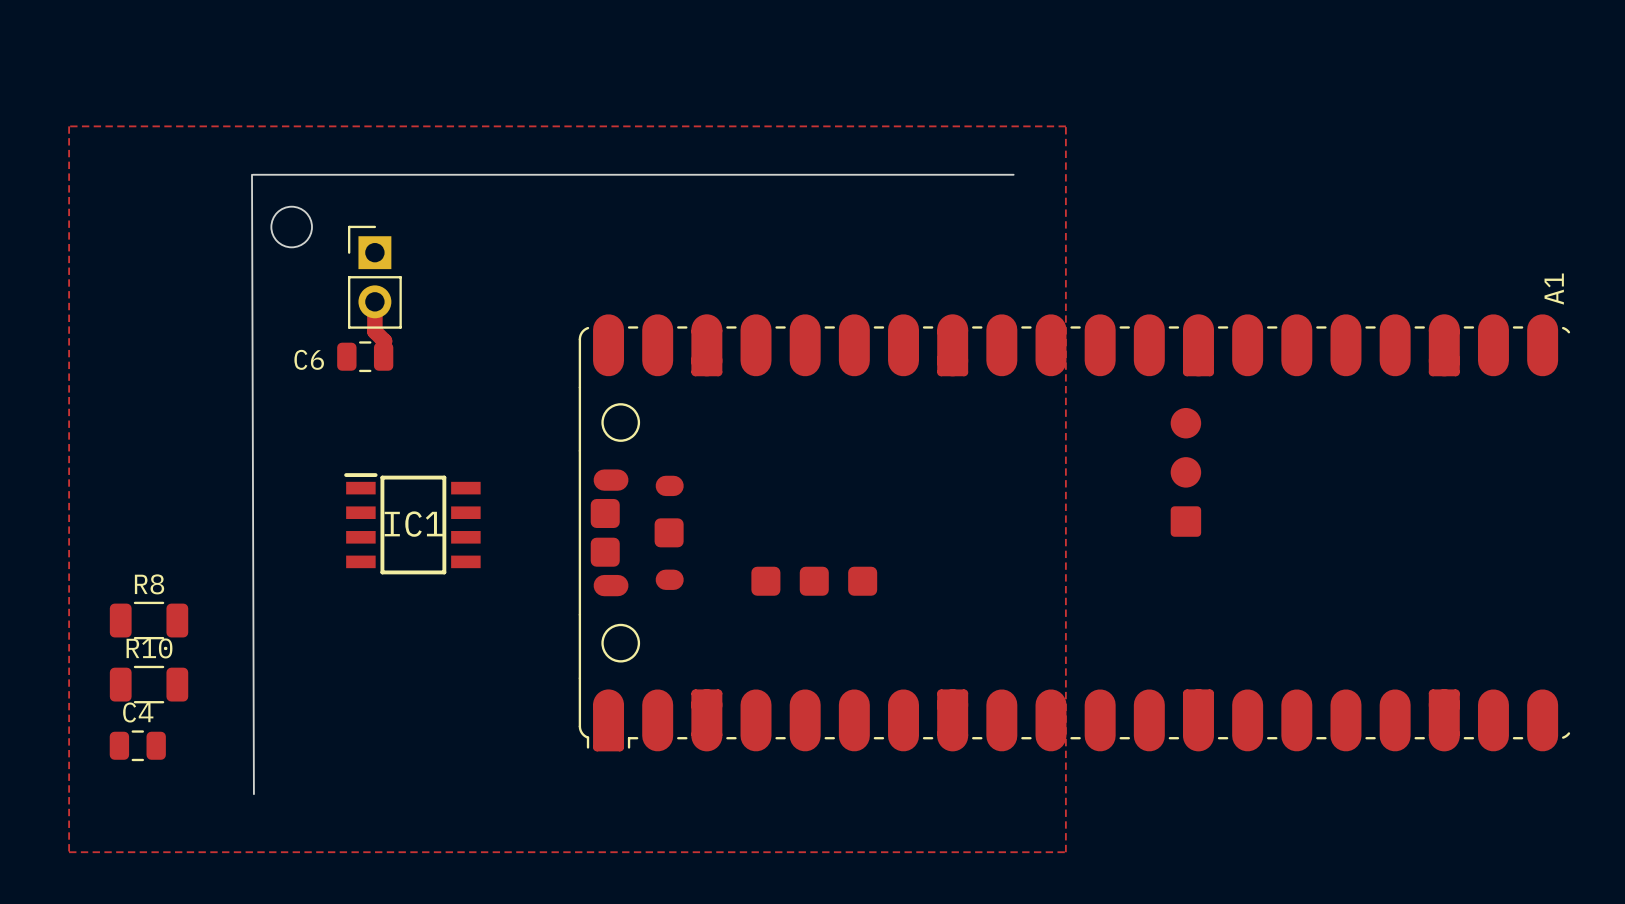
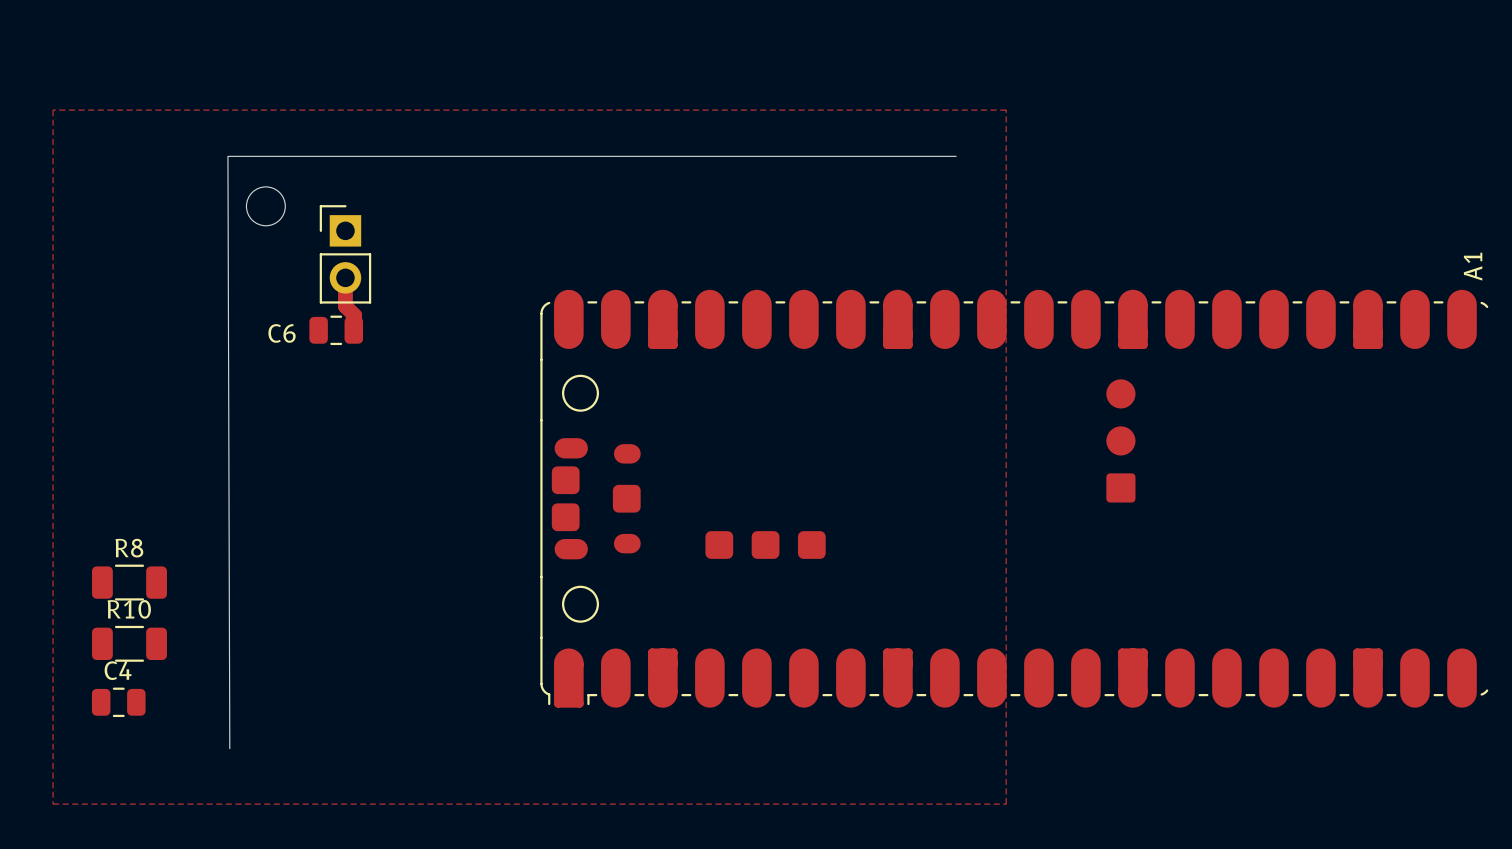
IC1: (412, 523) -> none

